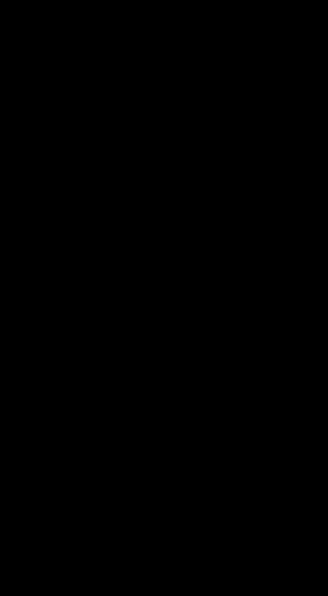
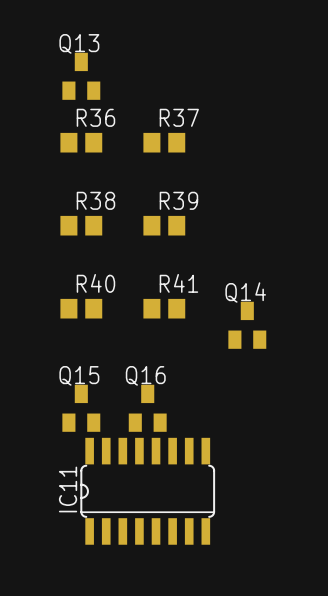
Q13: none -> (81, 76)
R36: none -> (81, 142)
R37: none -> (164, 142)
R38: none -> (81, 225)
R39: none -> (164, 225)
R40: none -> (81, 308)
R41: none -> (164, 308)
Q14: none -> (247, 325)
Q15: none -> (81, 408)
Q16: none -> (147, 408)
IC11: none -> (147, 491)

